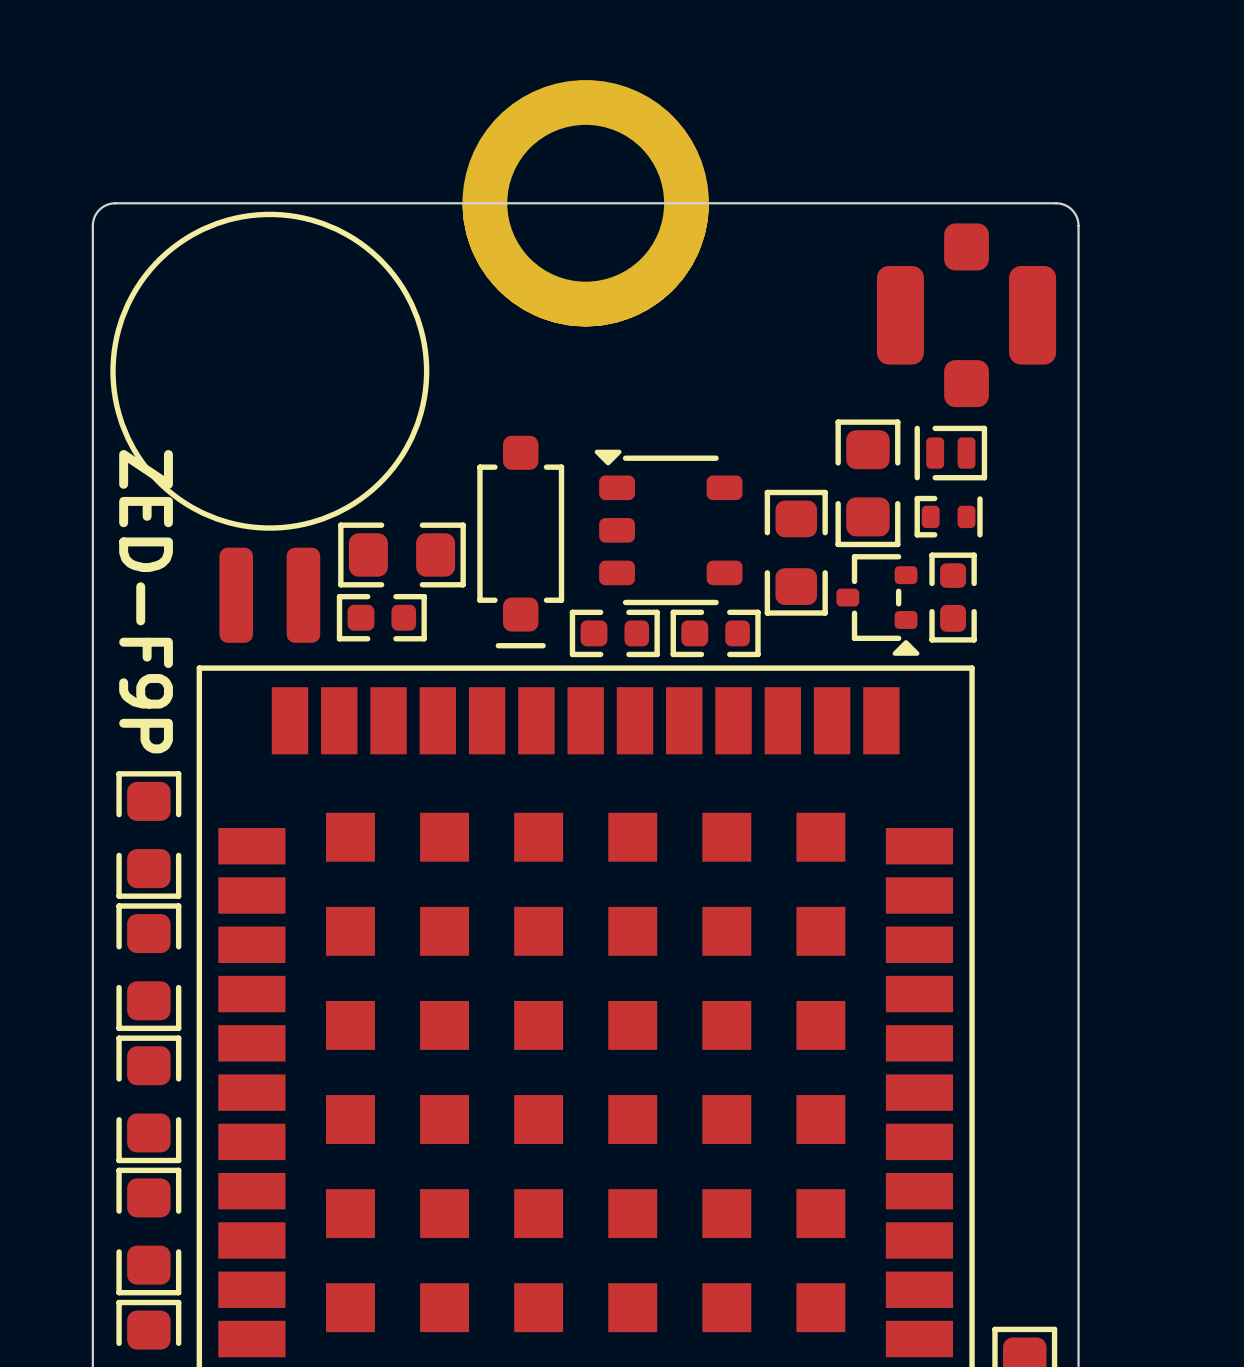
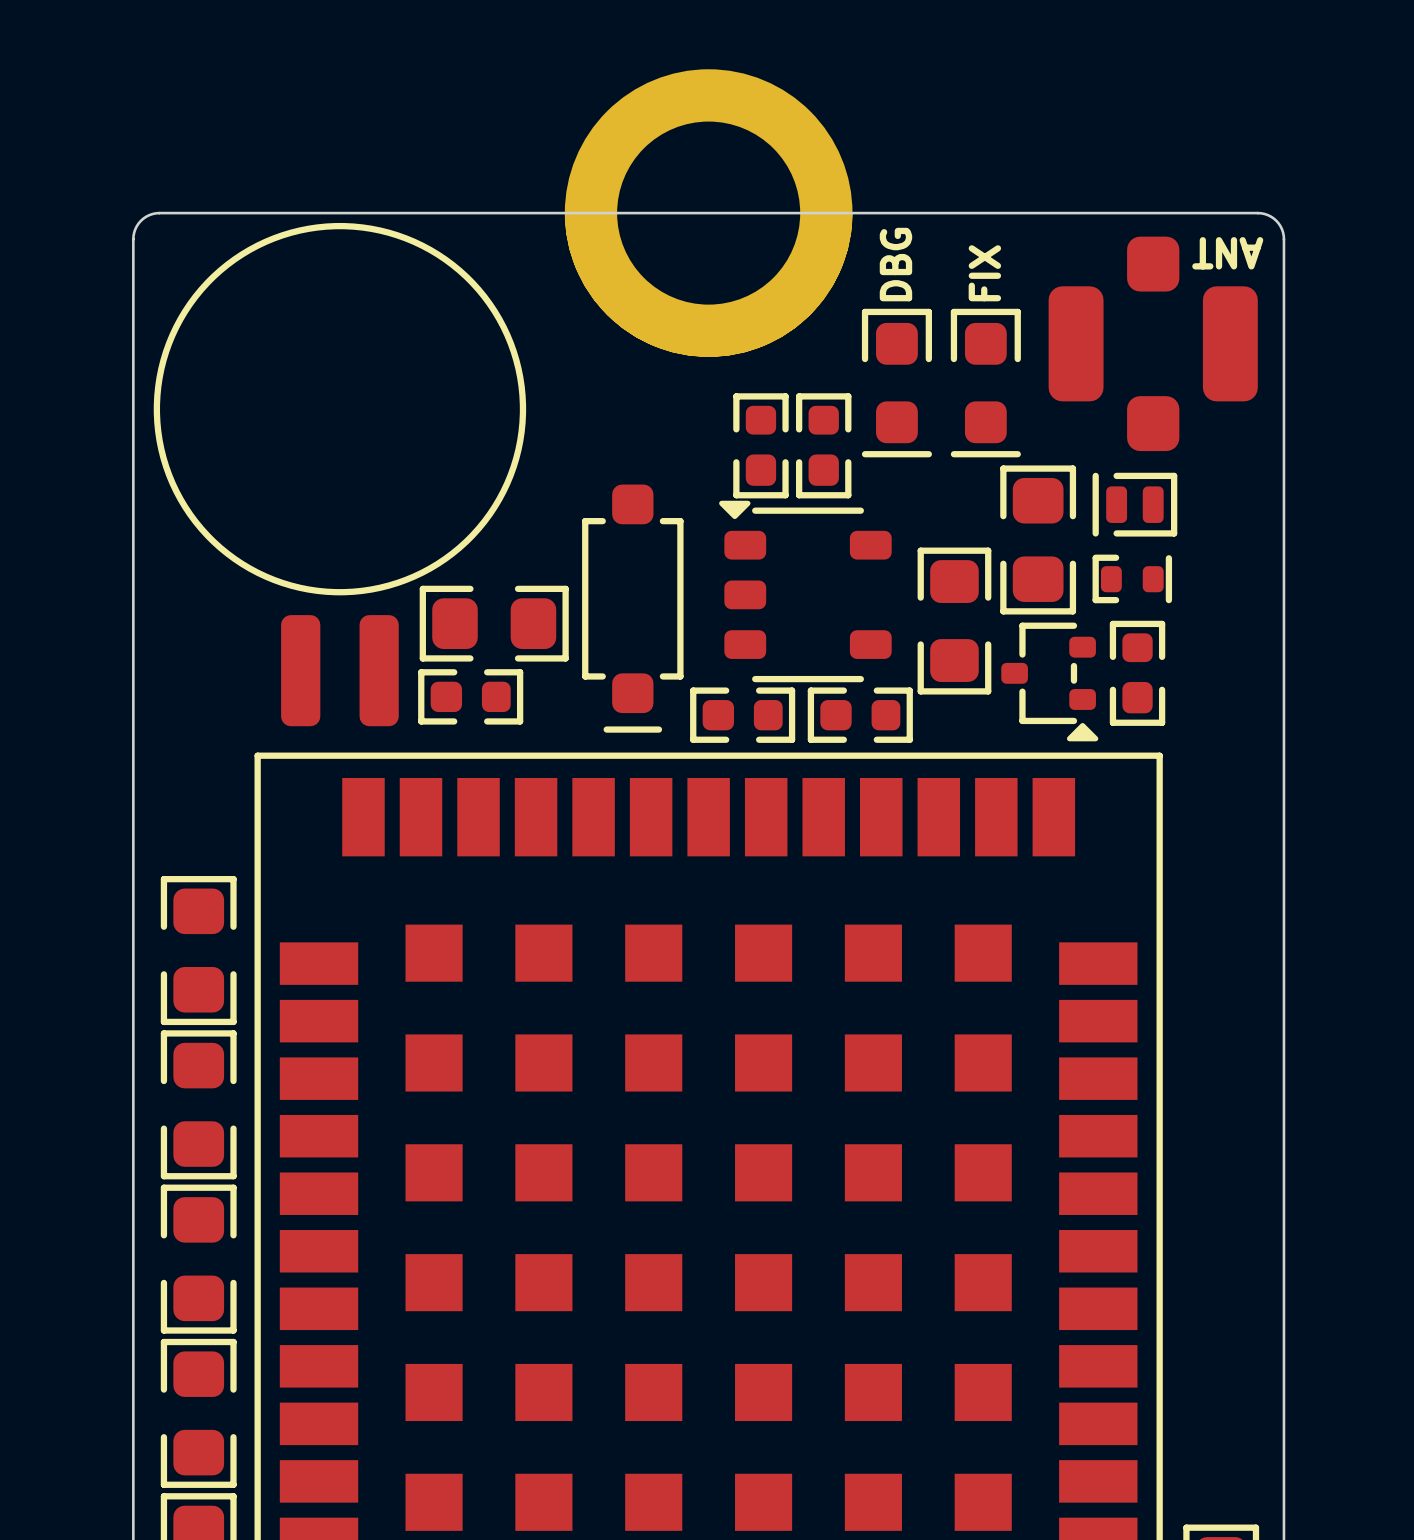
text: none -> ANT (1227, 253)
text: none -> DBG (895, 264)
text: none -> FIX (984, 273)
part: none -> (896, 383)
part: none -> (985, 383)
part: none -> (760, 445)
part: none -> (823, 445)
text: ZED-F9P (146, 601) -> none

